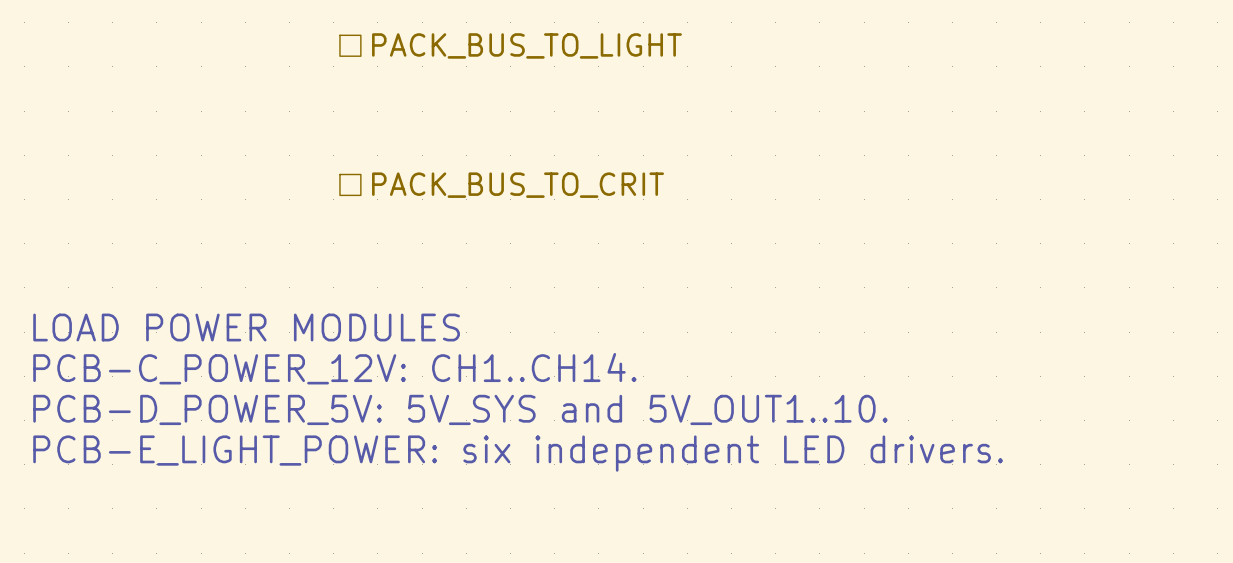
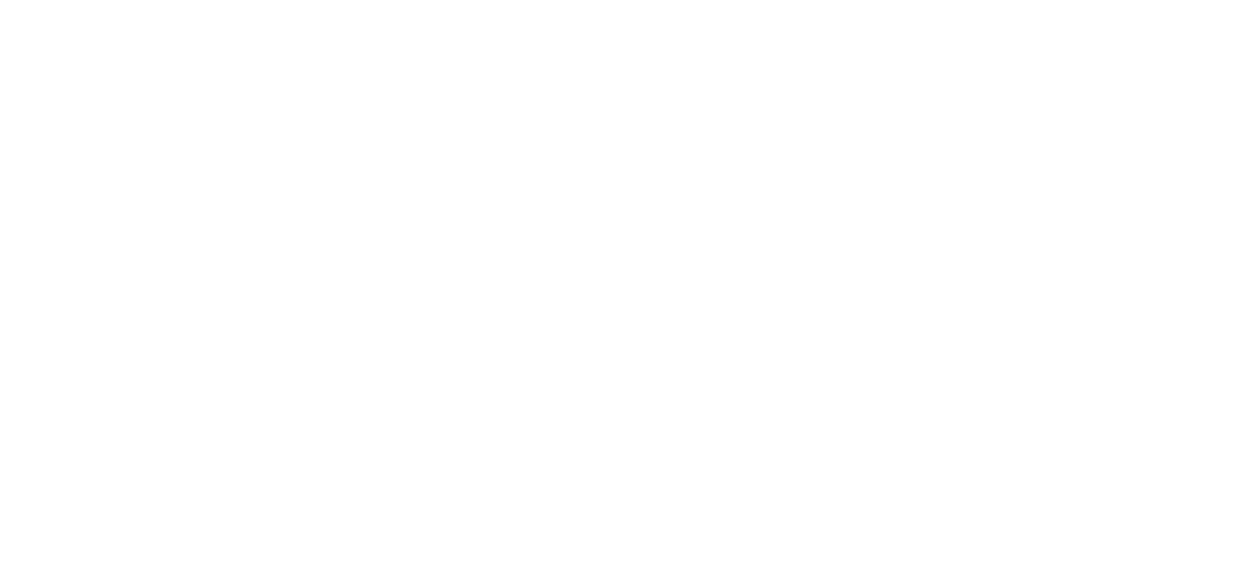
hierarchical label: PACK_BUS_TO_LIGHT (526, 45) -> none
hierarchical label: PACK_BUS_TO_CRIT (518, 185) -> none
text: LOAD POWER MODULES (246, 327) -> none
text: PCB-C_POWER_12V: CH1..CH14. (334, 368) -> none
text: PCB-D_POWER_5V: 5V_SYS and 5V_OUT1..10. (460, 409) -> none
text: PCB-E_LIGHT_POWER: six independent LED drivers. (518, 453) -> none

